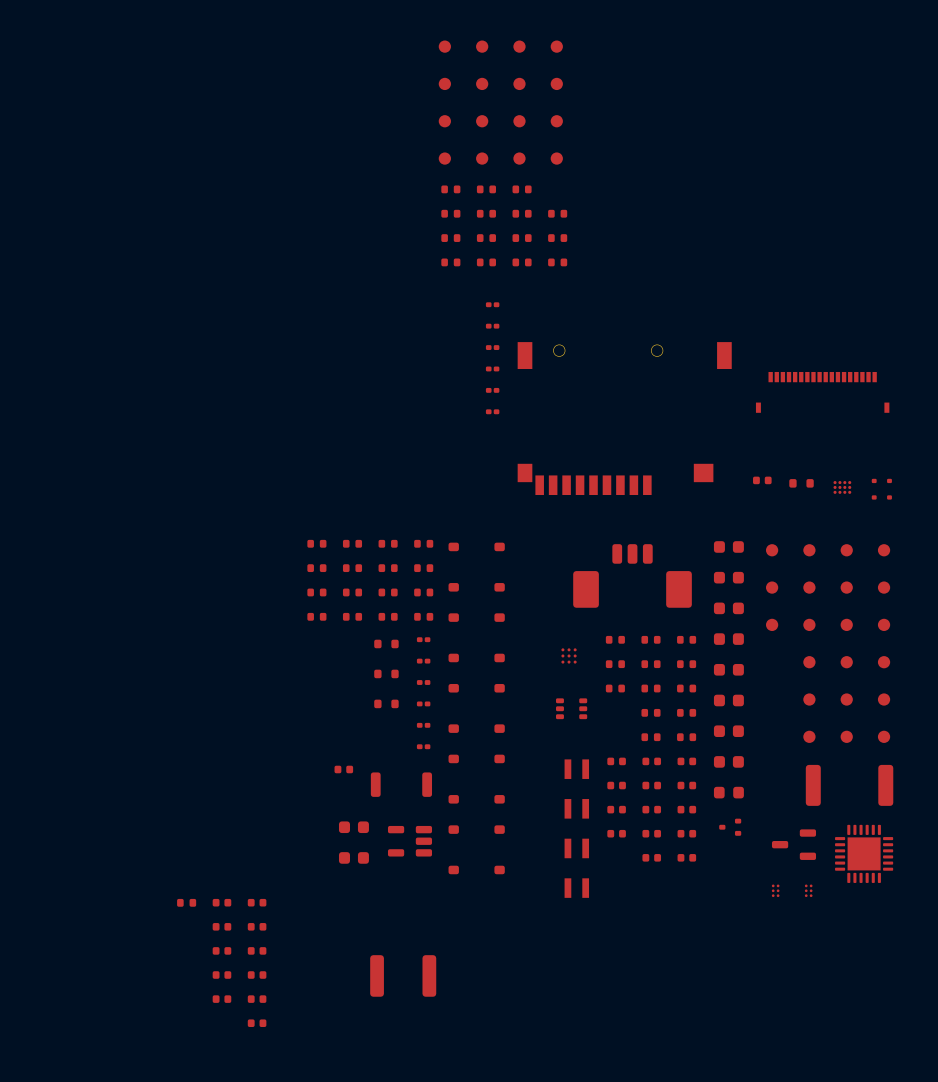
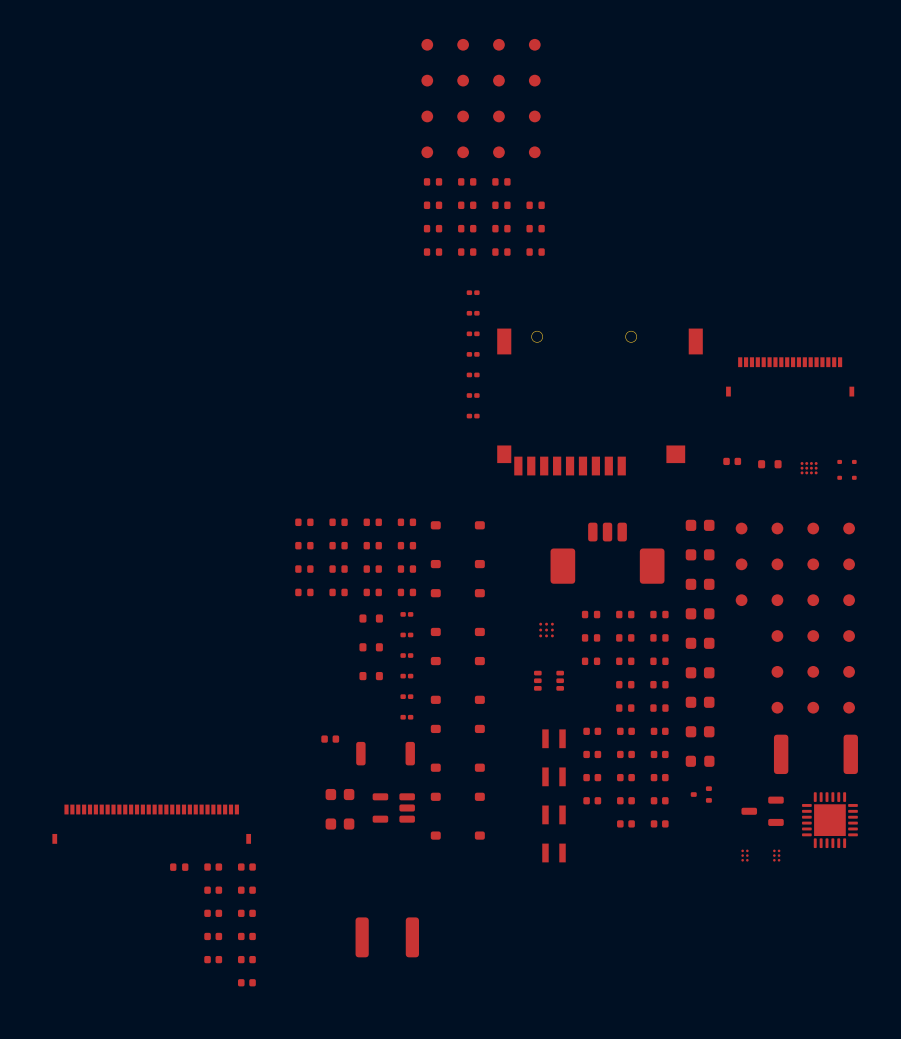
part: none -> (473, 416)
part: none -> (151, 824)

